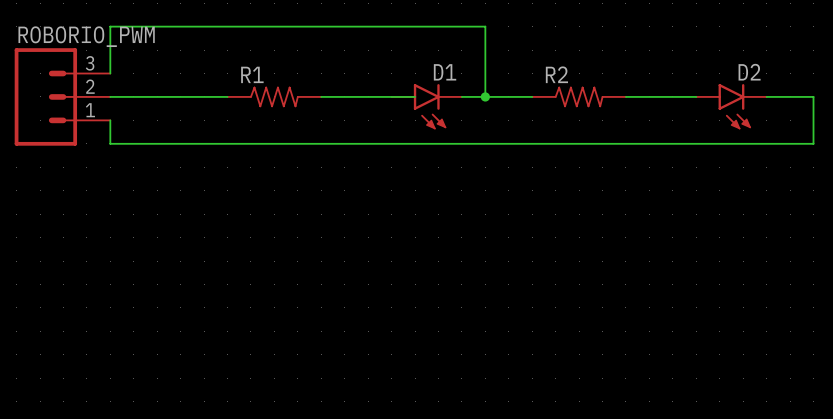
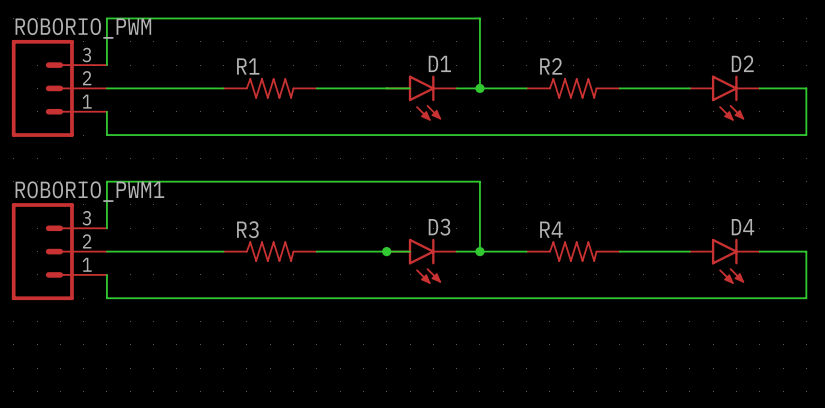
wire: none -> (106, 228) (106, 181) (479, 181) (479, 251)
ROBORIO_PWM1: none -> (59, 251)
wire: none -> (106, 251) (223, 251)
R3: none -> (270, 251)
wire: none -> (316, 251) (410, 251)
junction: none -> (386, 251)
wire: none -> (456, 251) (526, 251)
junction: none -> (479, 251)
R4: none -> (573, 251)
wire: none -> (619, 251) (689, 251)
wire: none -> (759, 251) (806, 251) (806, 298) (106, 298) (106, 274)
D3: none -> (421, 261)
D4: none -> (724, 261)

